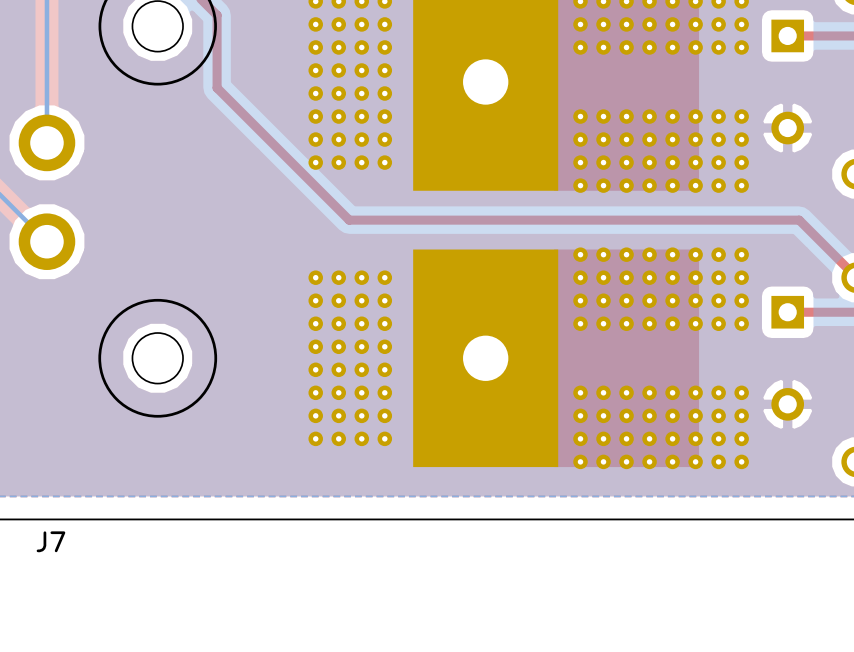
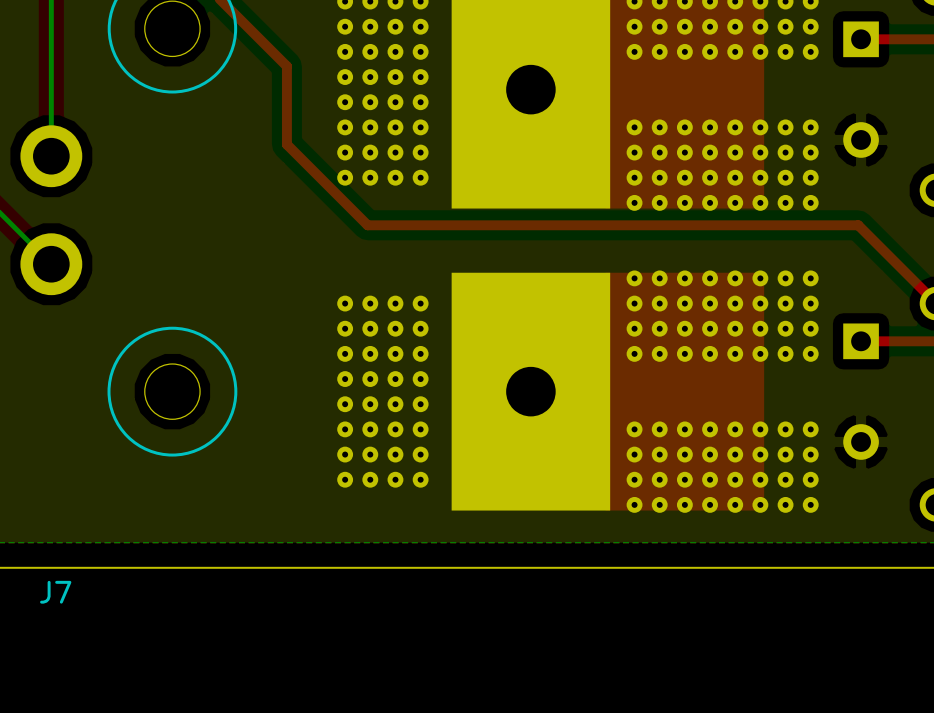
top track: (217, 15) (217, 87) (349, 220) (799, 220) -> (237, 16) (286, 66) (286, 144) (367, 225) (858, 225) (873, 240)

